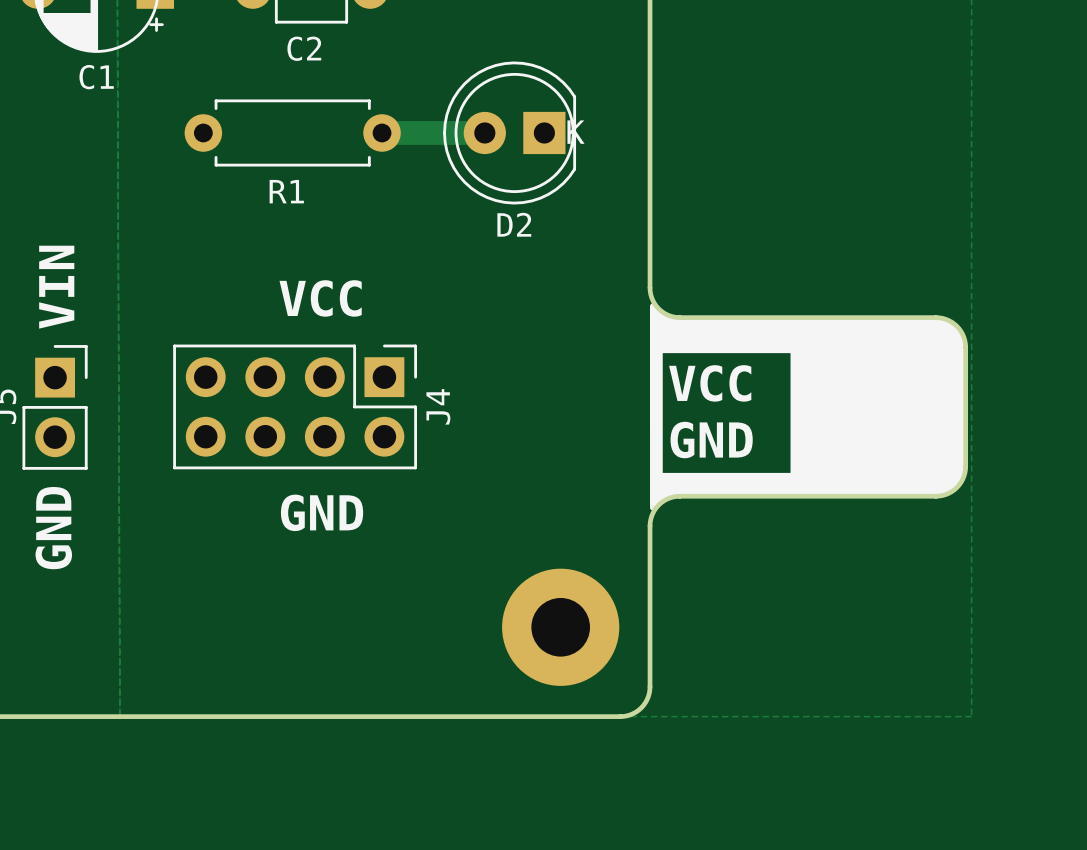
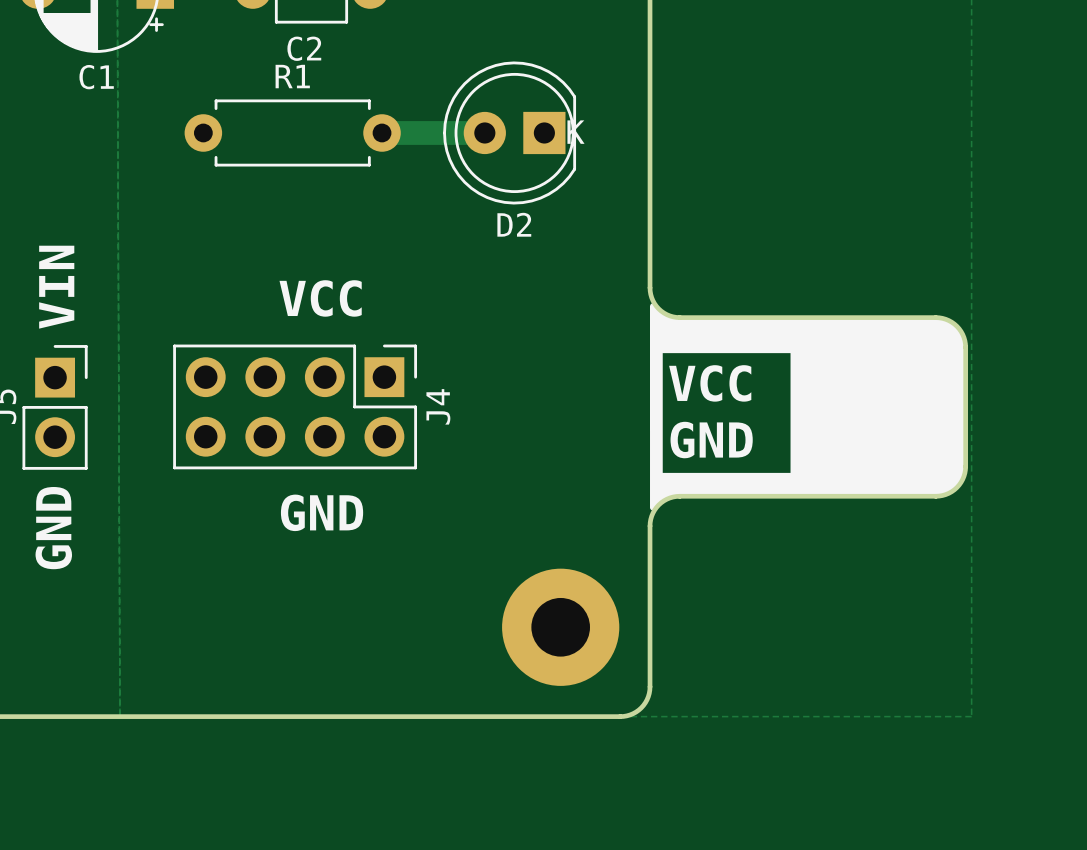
R1 name position: R1 (286, 191) -> R1 (292, 76)

